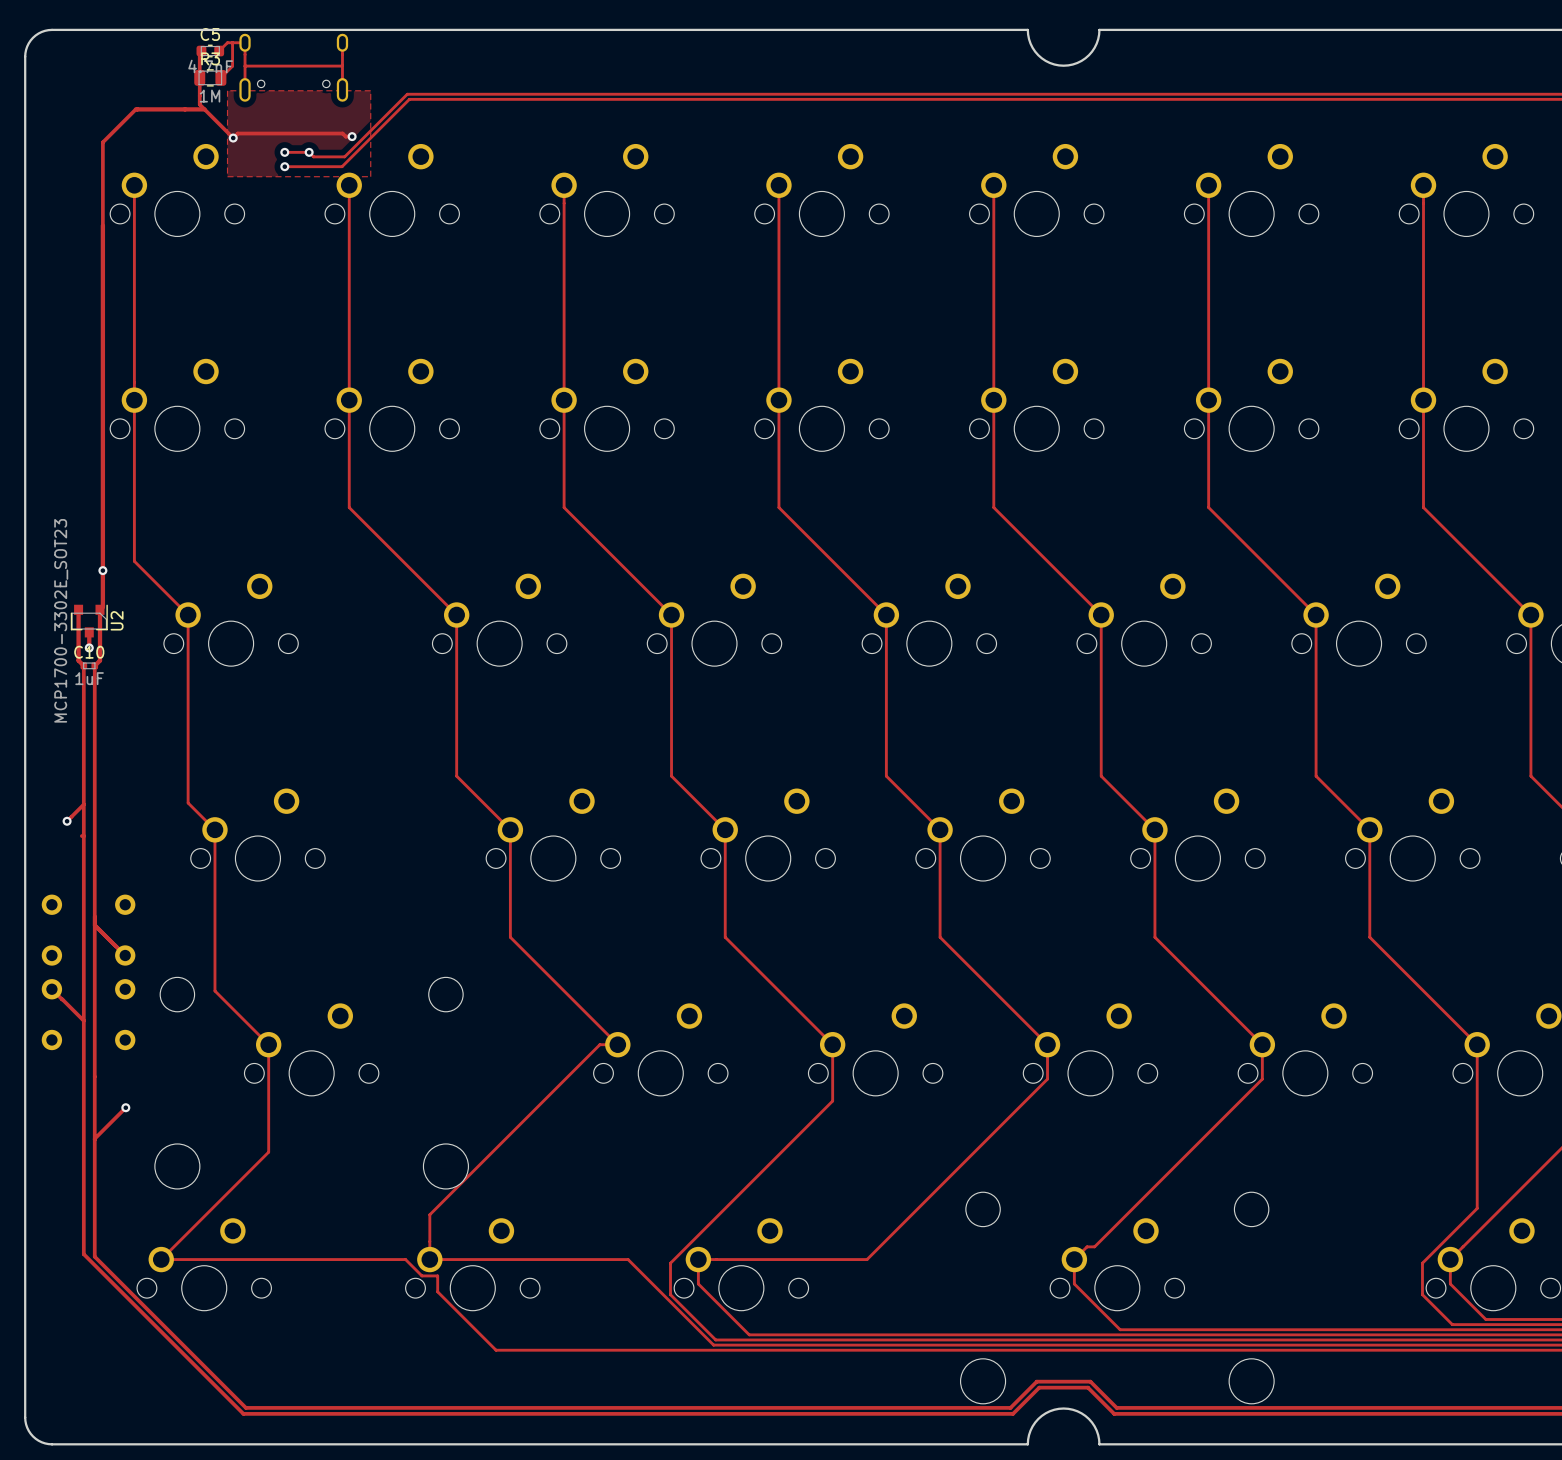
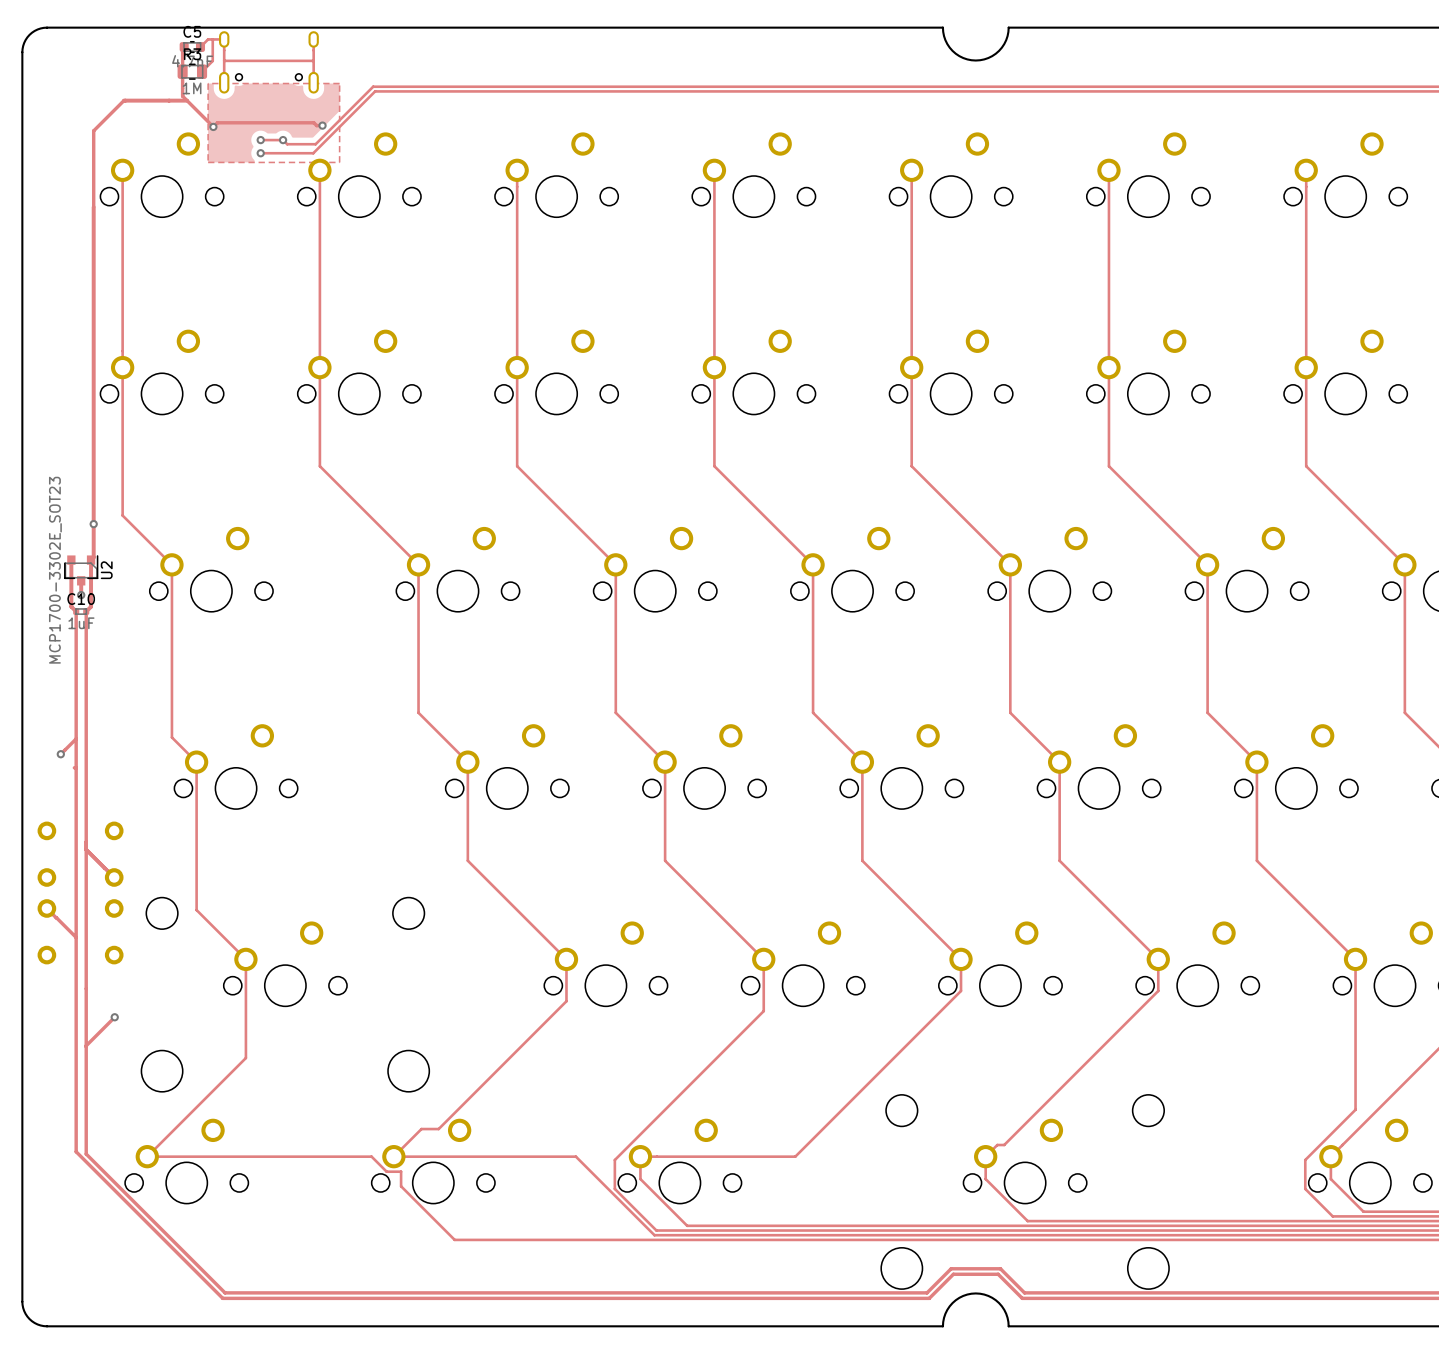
track: (617, 1044) (599, 1044) (429, 1214) (429, 1259) -> (566, 959) (566, 1001) (438, 1129) (421, 1129) (393, 1156)

